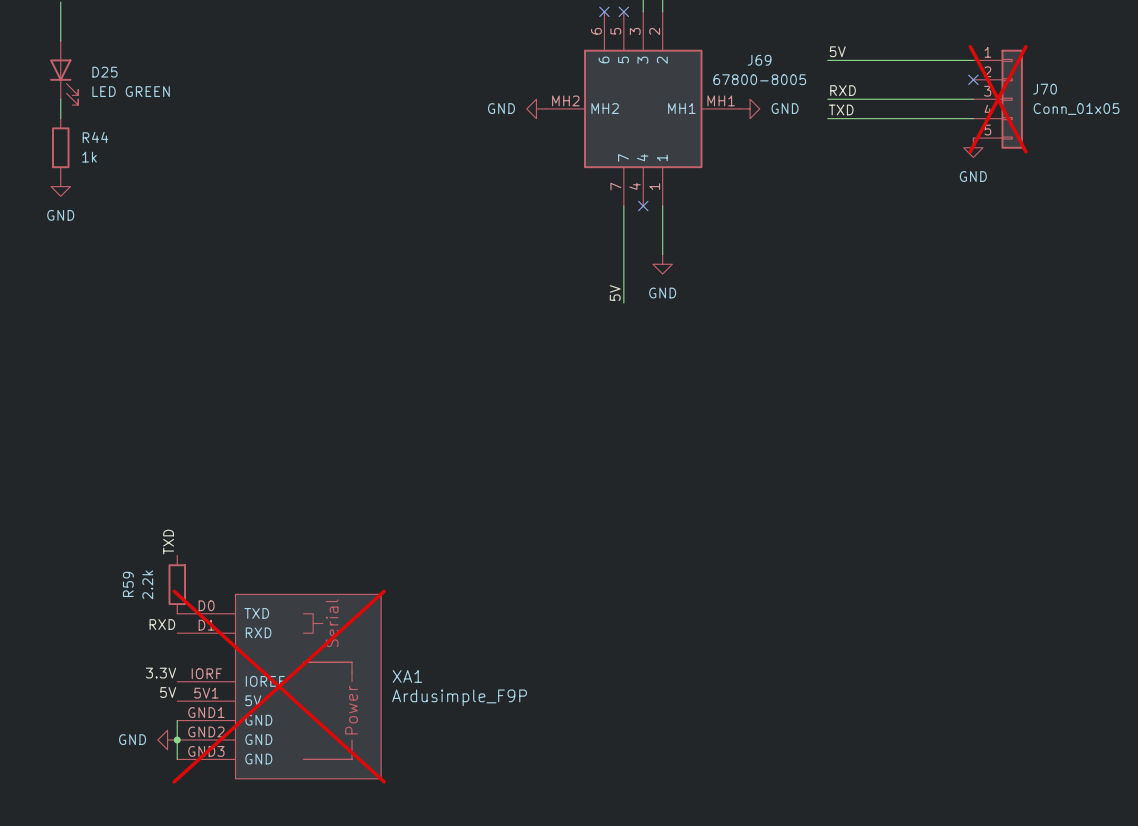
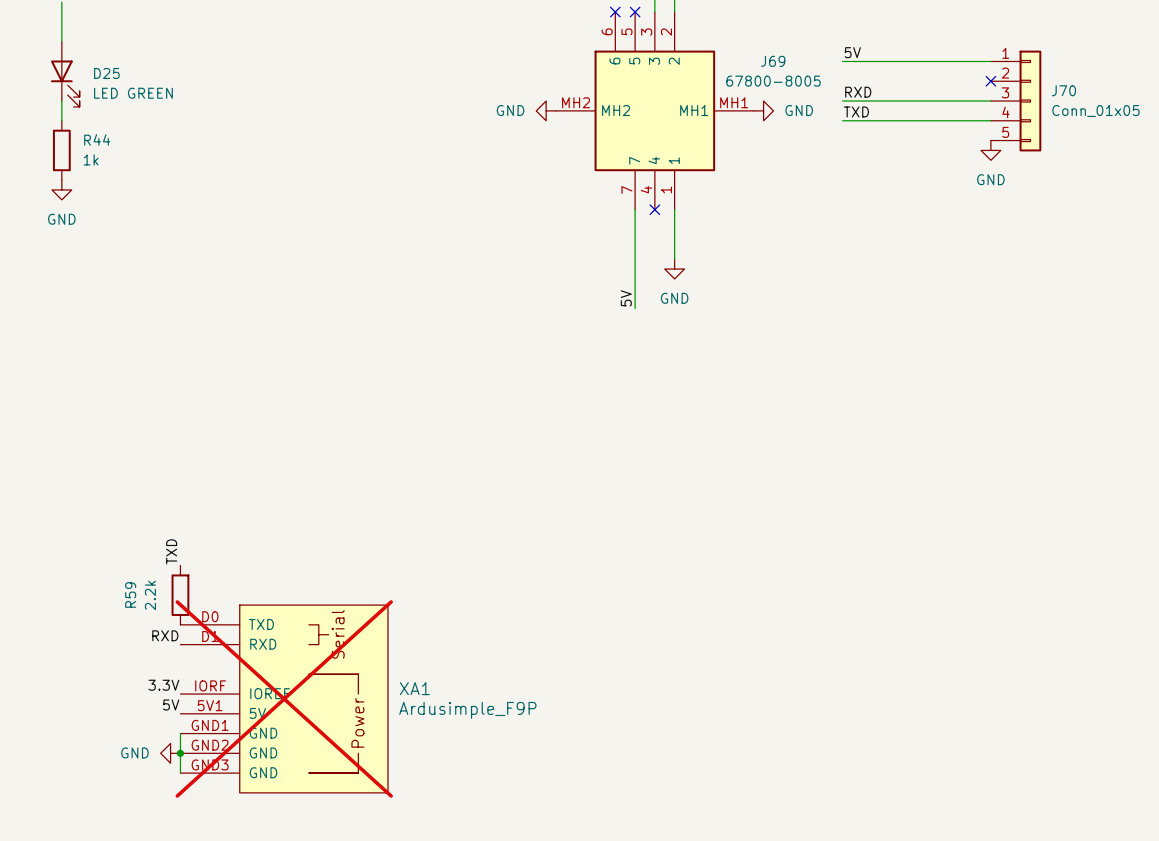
J70 do-not-place cross: (998, 99) -> none

